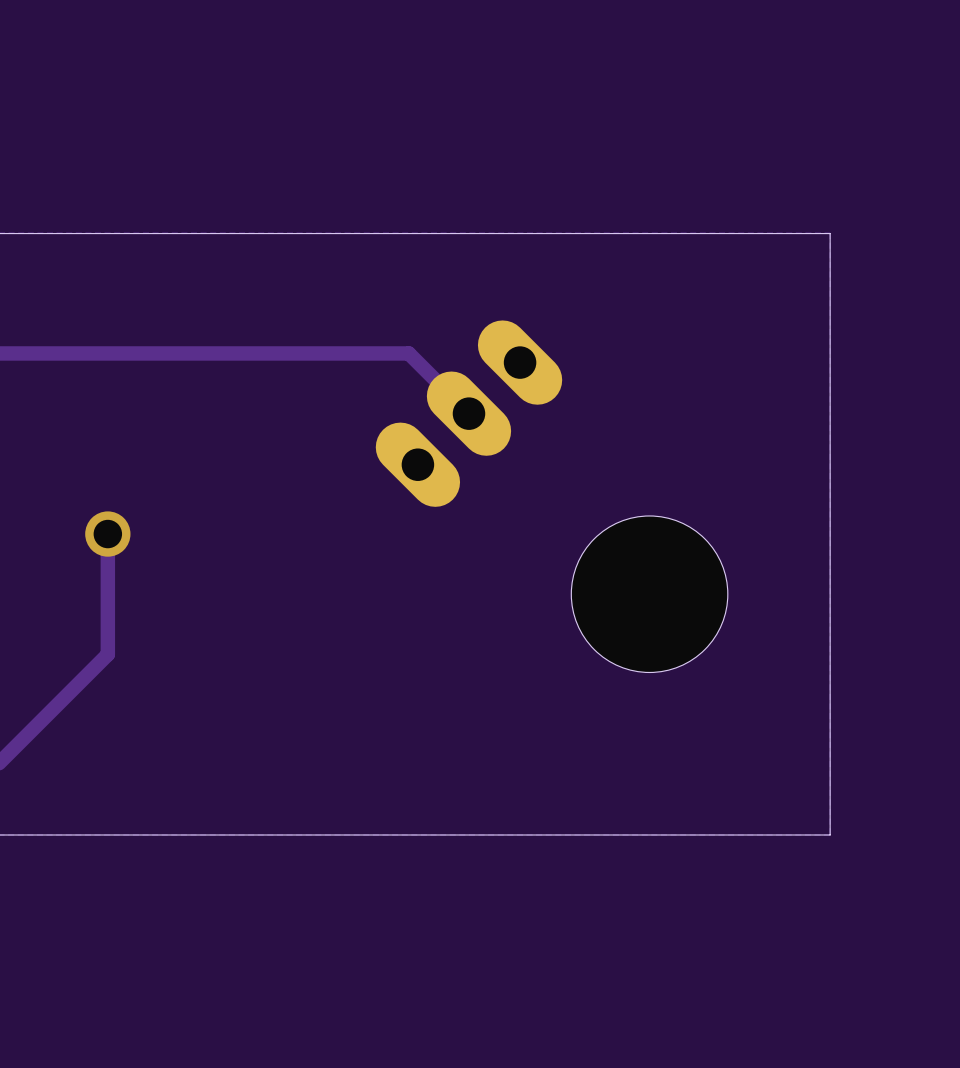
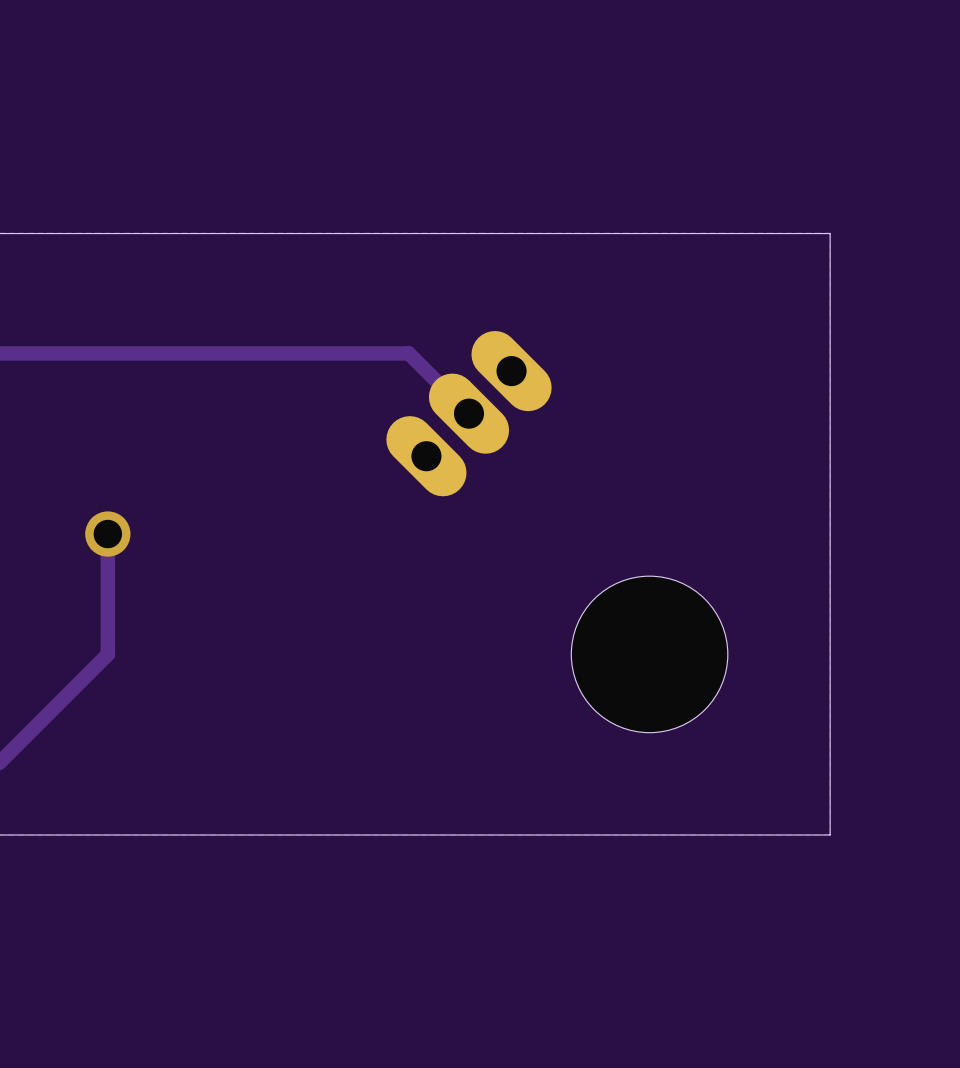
part footprint: [375, 320, 563, 507] -> [386, 331, 552, 497]
part position: (649, 594) -> (649, 654)

